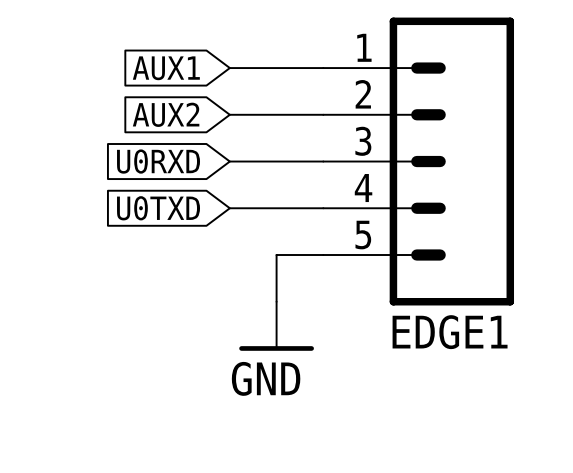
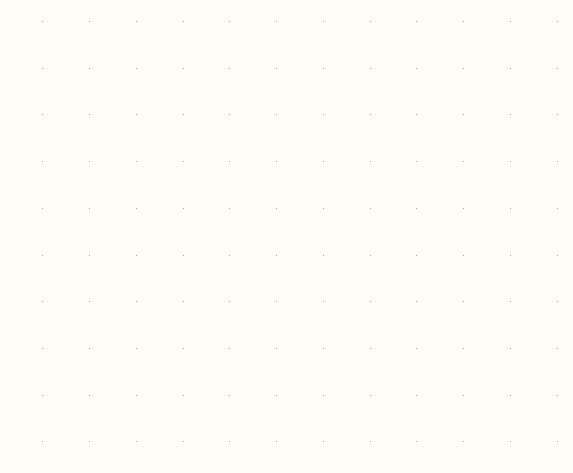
global label: AUX1 (166, 68) -> none
wire: (229, 68) (323, 68) -> none
global label: AUX2 (166, 114) -> none
wire: (229, 114) (323, 114) -> none
global label: U0RXD (158, 161) -> none
wire: (229, 161) (323, 161) -> none
EDGE1: (418, 161) -> none
global label: U0TXD (158, 208) -> none
wire: (229, 208) (323, 208) -> none
wire: (323, 255) (276, 255) (276, 301) -> none
power symbol: GND (276, 326) -> none

